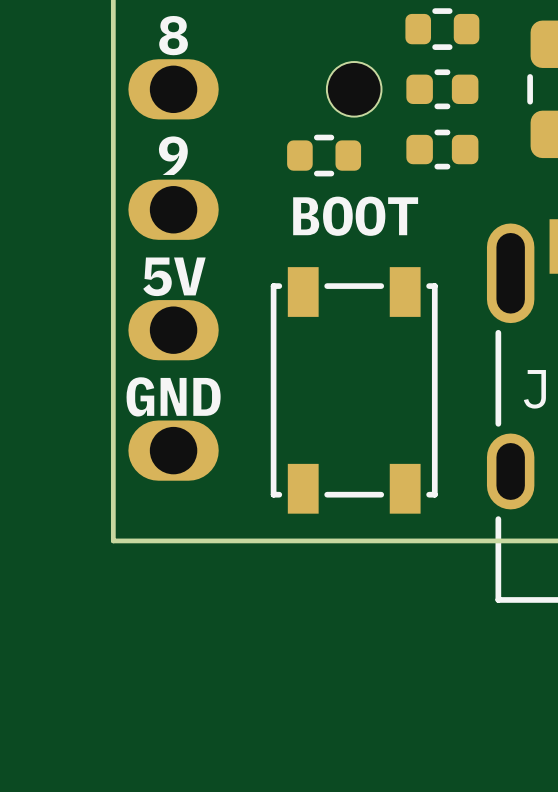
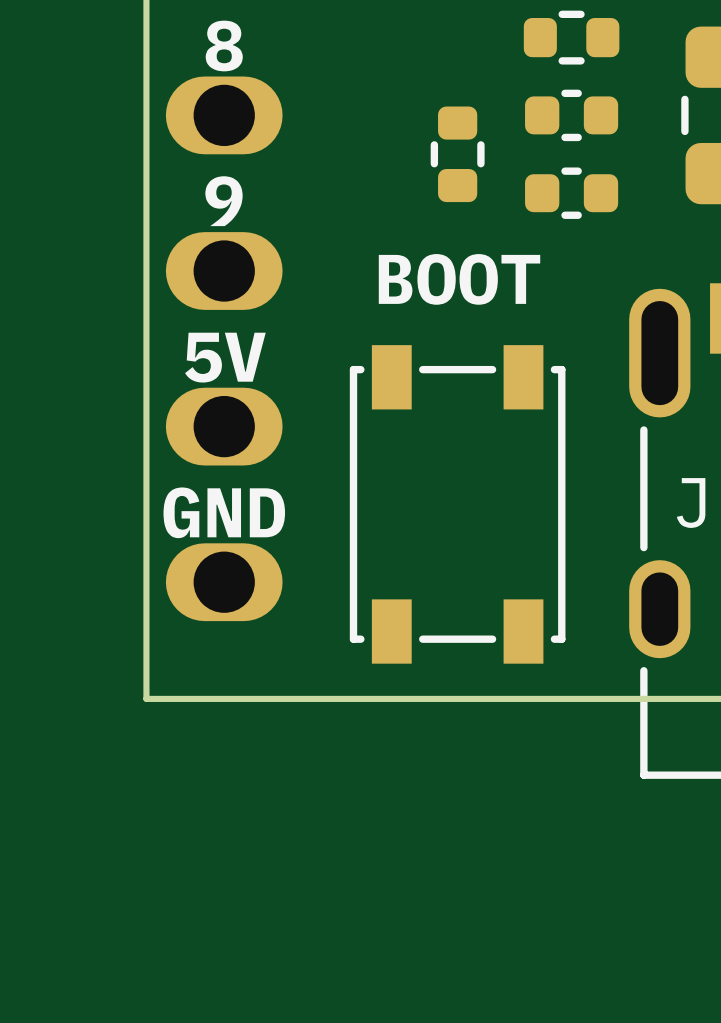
part: (354, 89) -> none
part rotation: 0° (324, 155) -> 90° clockwise (457, 154)
part position: (324, 155) -> (457, 154)

